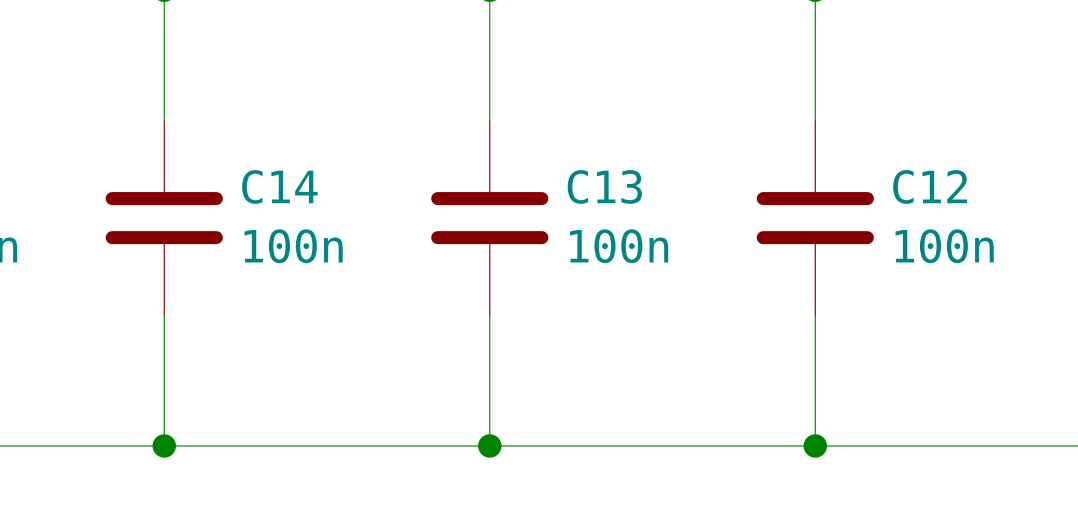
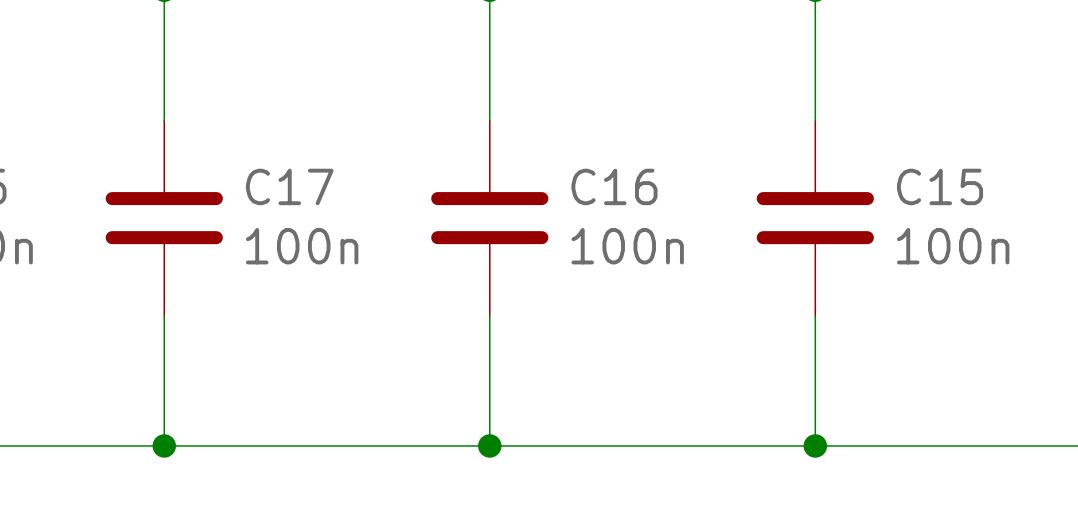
C14 name: C14 (279, 186) -> C17 (289, 186)
C13 name: C13 (604, 186) -> C16 (614, 186)
C12 name: C12 (930, 186) -> C15 (940, 186)

